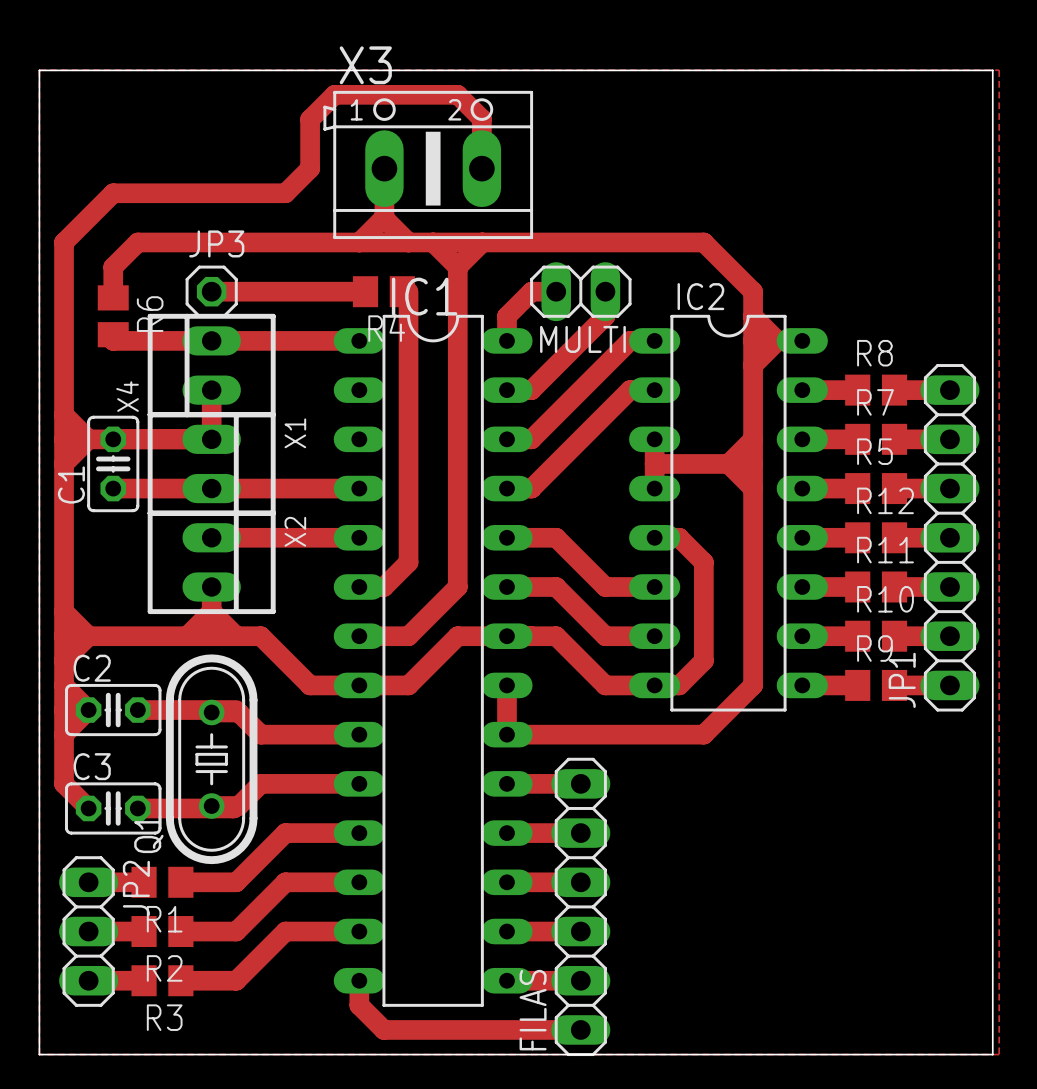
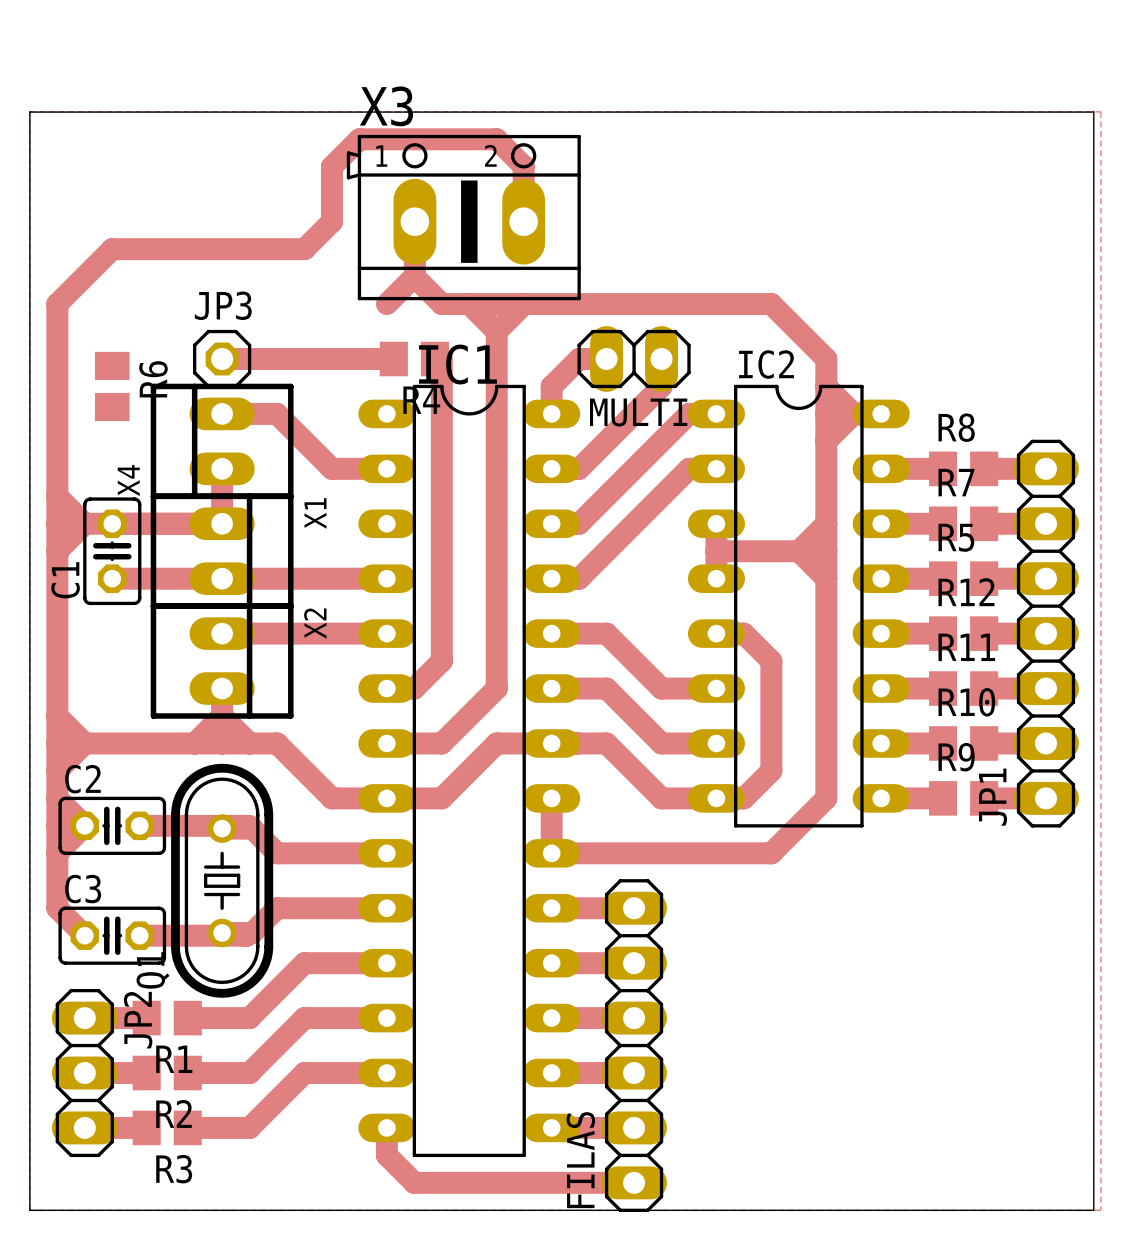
top track: (408, 242) (137, 242) (113, 267) (113, 297) -> none
top track: (113, 334) (113, 340) (211, 340) -> none
top track: (260, 340) (359, 340) -> (277, 413) (331, 468) (386, 468)

